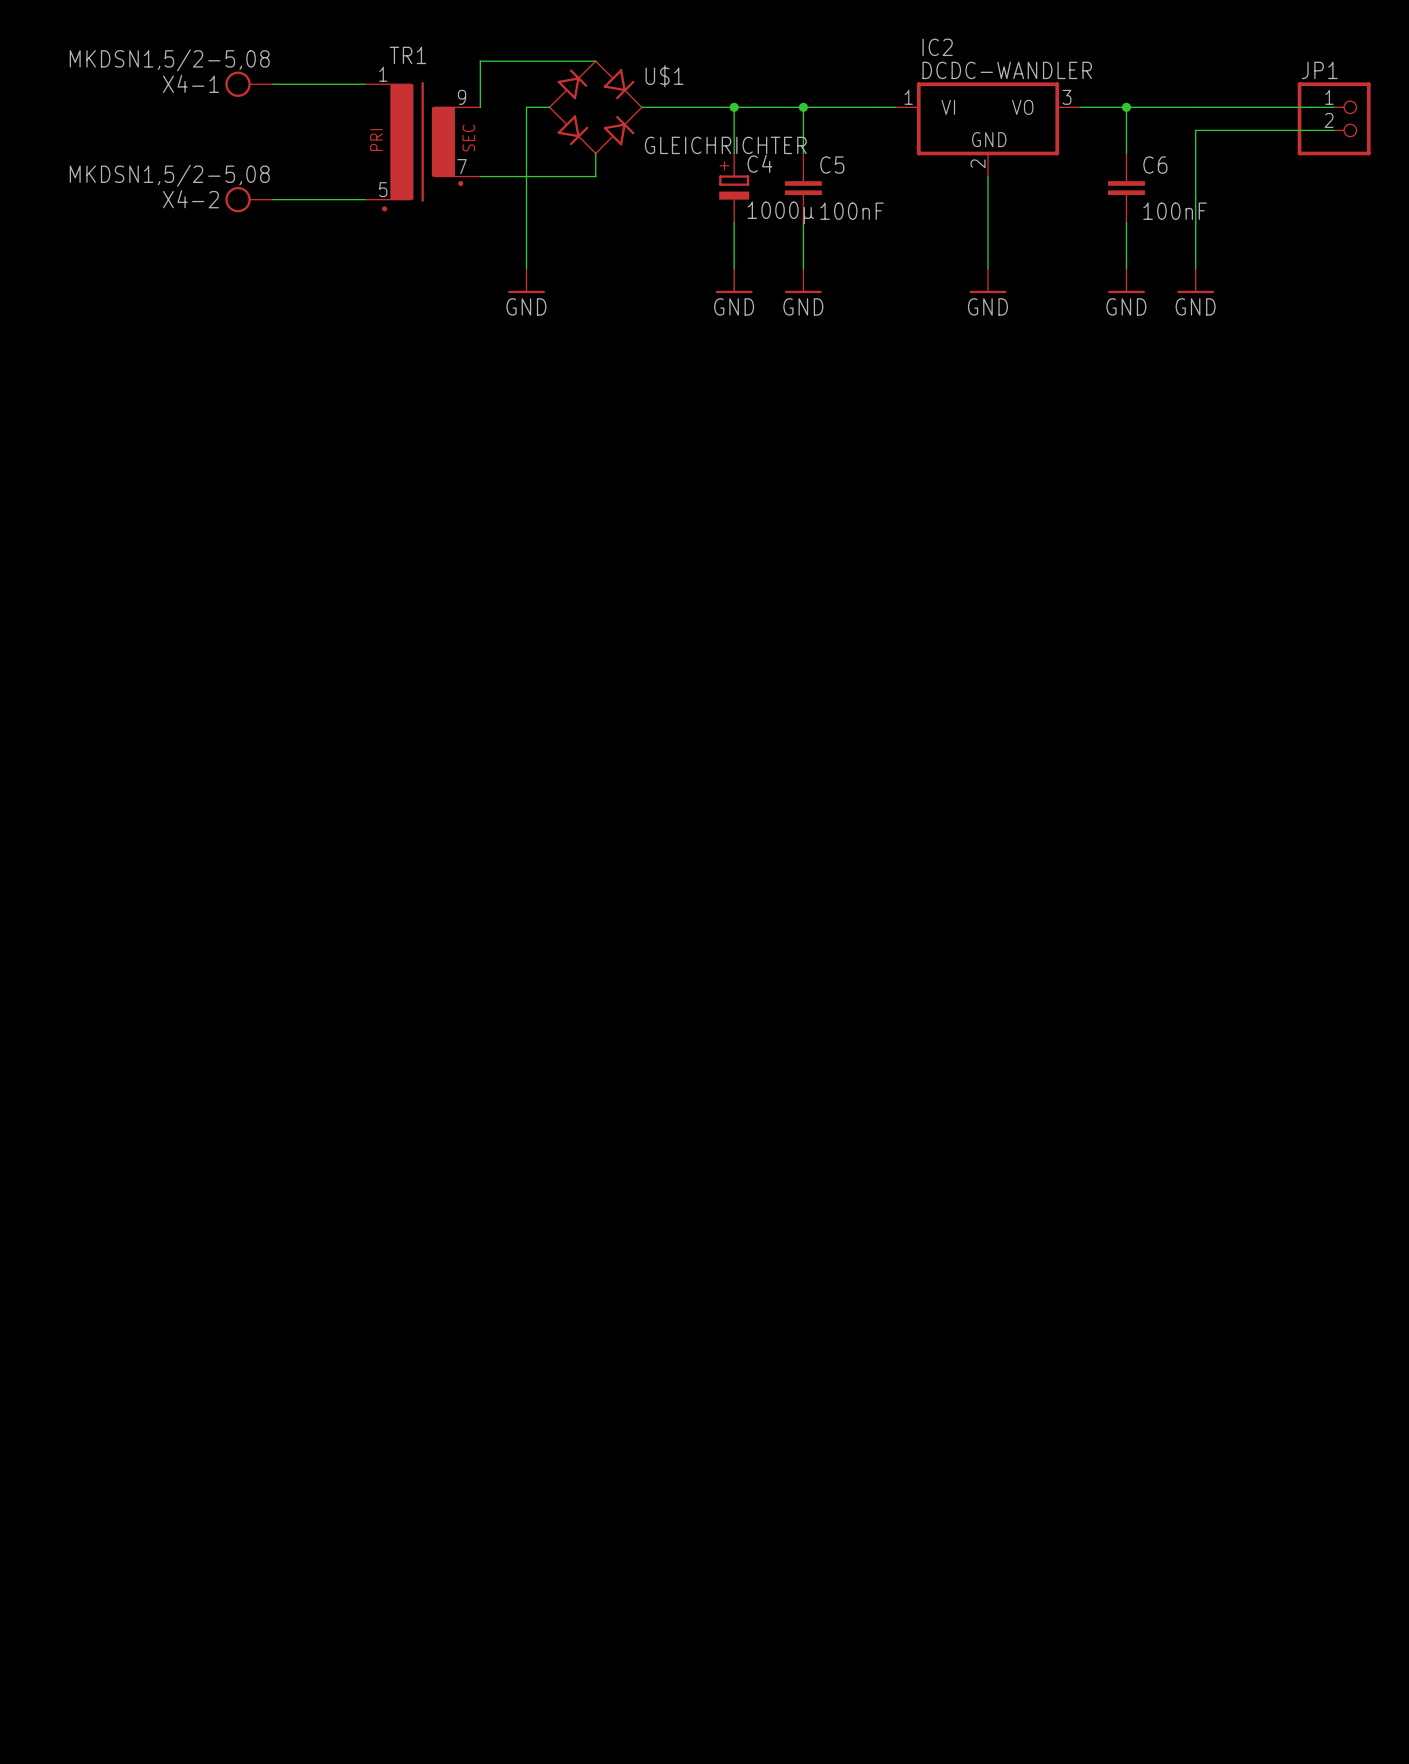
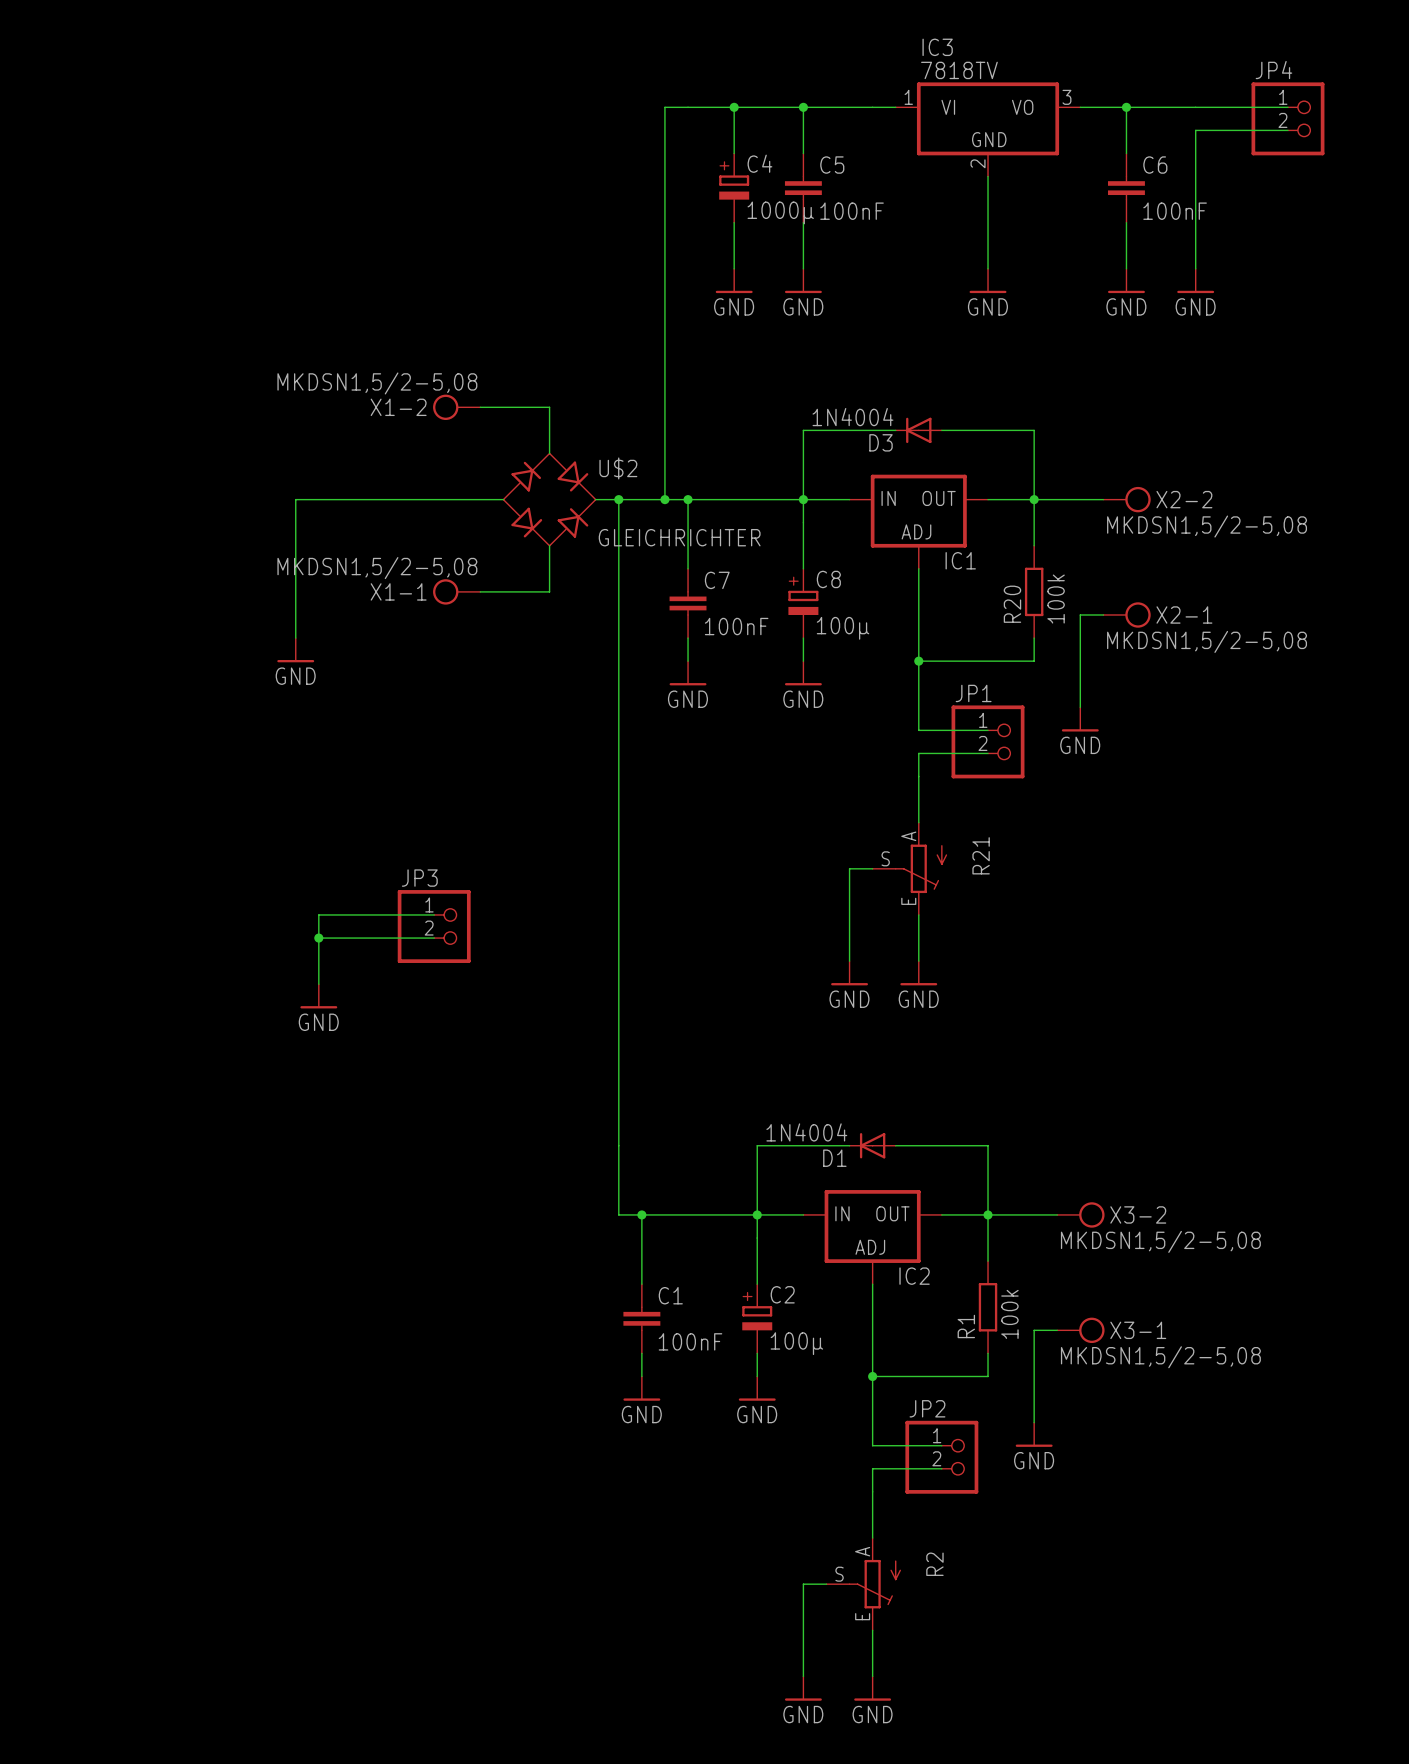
IC2 name: IC2 (937, 47) -> IC3 (937, 47)
wire: (595, 61) (480, 61) (480, 107) -> none
IC2 value: DCDC-WANDLER (1007, 70) -> 7818TV (959, 70)
X4-1: MKDSN1,5/2-5,08 (249, 84) -> none
wire: (272, 84) (364, 84) -> none
wire: (549, 107) (526, 107) (526, 268) -> none
U$1: GLEICHRICHTER (595, 107) -> none
wire: (641, 107) (664, 107) -> (664, 499) (664, 107)
wire: (1287, 107) (1334, 107) -> none
JP4: none -> (1287, 118)
JP1 position: (1334, 118) -> (988, 741)
wire: (1287, 130) (1334, 130) -> none
TR1: (422, 146) -> none
wire: (595, 153) (595, 176) (480, 176) -> none
X4-2: MKDSN1,5/2-5,08 (249, 199) -> none
wire: (272, 199) (364, 199) -> none
power symbol: GND (526, 280) -> none
X1-2: none -> MKDSN1,5/2-5,08 (456, 407)
wire: none -> (480, 407) (549, 407) (549, 453)
wire: none -> (895, 430) (803, 430) (803, 568)
D3: none -> 1N4004 (918, 430)
wire: none -> (941, 430) (1034, 430) (1034, 545)
wire: none -> (503, 499) (295, 499) (295, 638)
U$2: none -> GLEICHRICHTER (549, 499)
wire: none -> (595, 499) (849, 499)
wire: none -> (618, 499) (618, 1214) (803, 1214)
junction: none -> (618, 499)
junction: none -> (664, 499)
wire: none -> (688, 499) (688, 568)
junction: none -> (688, 499)
junction: none -> (803, 499)
wire: none -> (988, 499) (1103, 499)
junction: none -> (1034, 499)
X2-2: none -> MKDSN1,5/2-5,08 (1127, 499)
IC1: none -> (918, 521)
wire: none -> (549, 545) (549, 591) (480, 591)
wire: none -> (918, 568) (918, 730) (988, 730)
X1-1: none -> MKDSN1,5/2-5,08 (456, 591)
R20: none -> 100k (1034, 591)
C7: none -> 100nF (688, 603)
C8: none -> 100µ (803, 603)
wire: none -> (1103, 614) (1080, 614) (1080, 707)
X2-1: none -> MKDSN1,5/2-5,08 (1127, 614)
wire: none -> (688, 638) (688, 661)
wire: none -> (803, 638) (803, 661)
wire: none -> (1034, 638) (1034, 661) (918, 661)
power symbol: none -> GND (295, 650)
junction: none -> (918, 661)
power symbol: none -> GND (688, 673)
power symbol: none -> GND (803, 673)
power symbol: none -> GND (1080, 719)
wire: none -> (988, 753) (918, 753) (918, 822)
wire: none -> (872, 868) (849, 868) (849, 961)
R21: none -> (909, 868)
wire: none -> (434, 914) (318, 914) (318, 984)
wire: none -> (918, 914) (918, 961)
JP3: none -> (434, 926)
wire: none -> (318, 938) (434, 938)
junction: none -> (318, 938)
power symbol: none -> GND (849, 973)
power symbol: none -> GND (918, 973)
power symbol: none -> GND (318, 996)
wire: none -> (849, 1145) (757, 1145) (757, 1284)
D1: none -> 1N4004 (872, 1145)
wire: none -> (895, 1145) (988, 1145) (988, 1261)
wire: none -> (641, 1214) (641, 1284)
junction: none -> (641, 1214)
junction: none -> (757, 1214)
wire: none -> (941, 1214) (1057, 1214)
junction: none -> (988, 1214)
X3-2: none -> MKDSN1,5/2-5,08 (1080, 1214)
IC2: none -> (872, 1237)
wire: none -> (872, 1284) (872, 1445) (941, 1445)
R1: none -> 100k (988, 1307)
C1: none -> 100nF (641, 1318)
C2: none -> 100µ (757, 1318)
wire: none -> (1057, 1330) (1034, 1330) (1034, 1422)
X3-1: none -> MKDSN1,5/2-5,08 (1080, 1330)
wire: none -> (641, 1353) (641, 1376)
wire: none -> (757, 1353) (757, 1376)
wire: none -> (988, 1353) (988, 1376) (872, 1376)
junction: none -> (872, 1376)
power symbol: none -> GND (641, 1388)
power symbol: none -> GND (757, 1388)
power symbol: none -> GND (1034, 1434)
JP2: none -> (941, 1457)
wire: none -> (941, 1468) (872, 1468) (872, 1538)
wire: none -> (826, 1584) (803, 1584) (803, 1676)
R2: none -> (863, 1584)
wire: none -> (872, 1630) (872, 1676)
power symbol: none -> GND (803, 1688)
power symbol: none -> GND (872, 1688)

